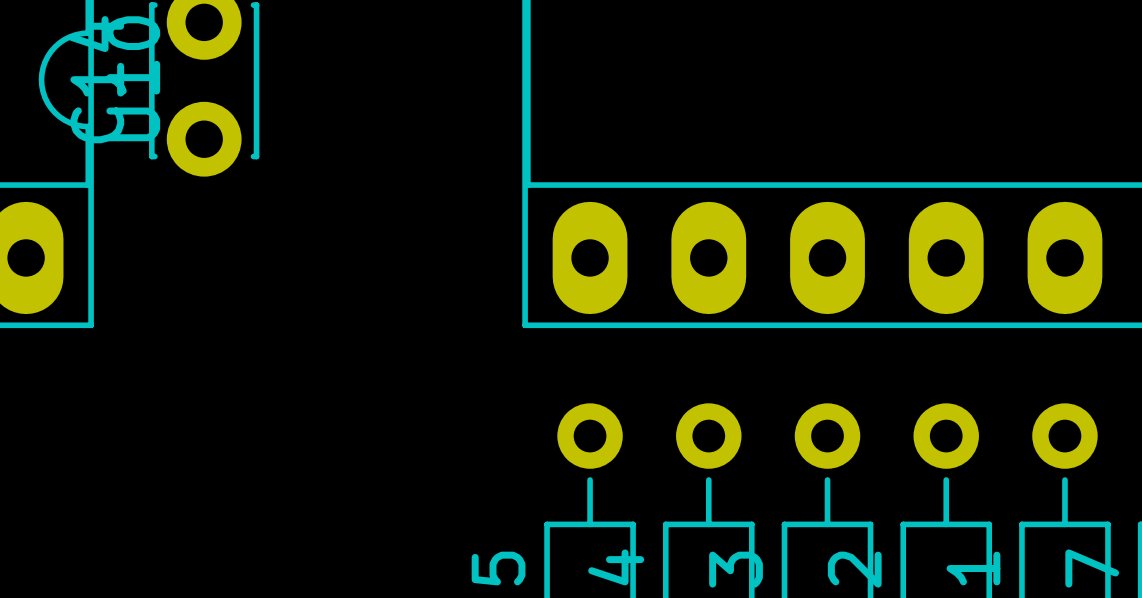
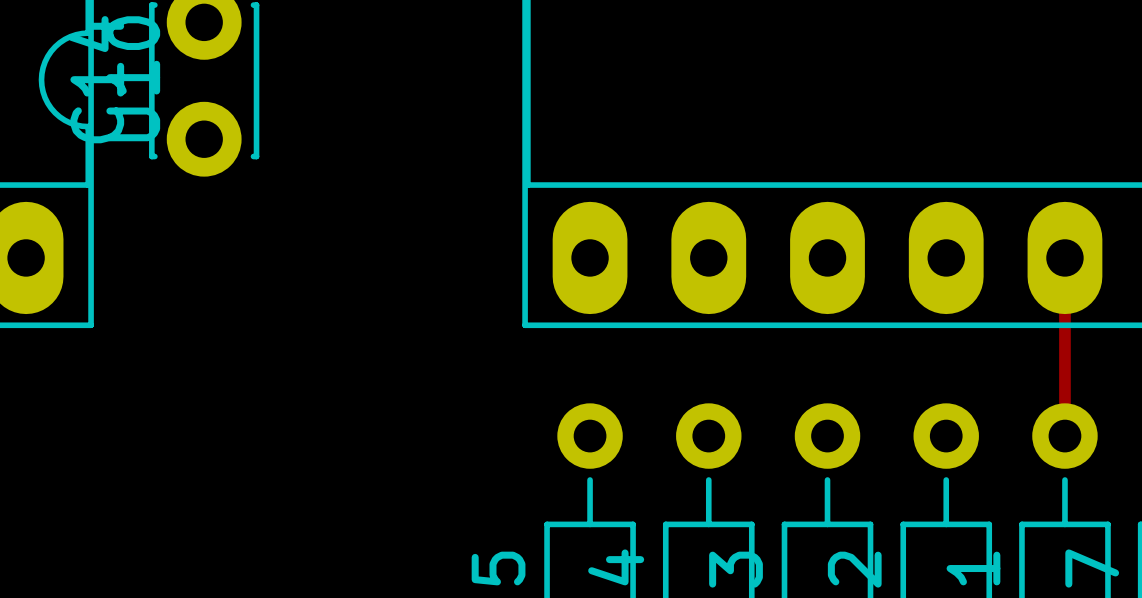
track: none -> (1064, 257) (1064, 436)

